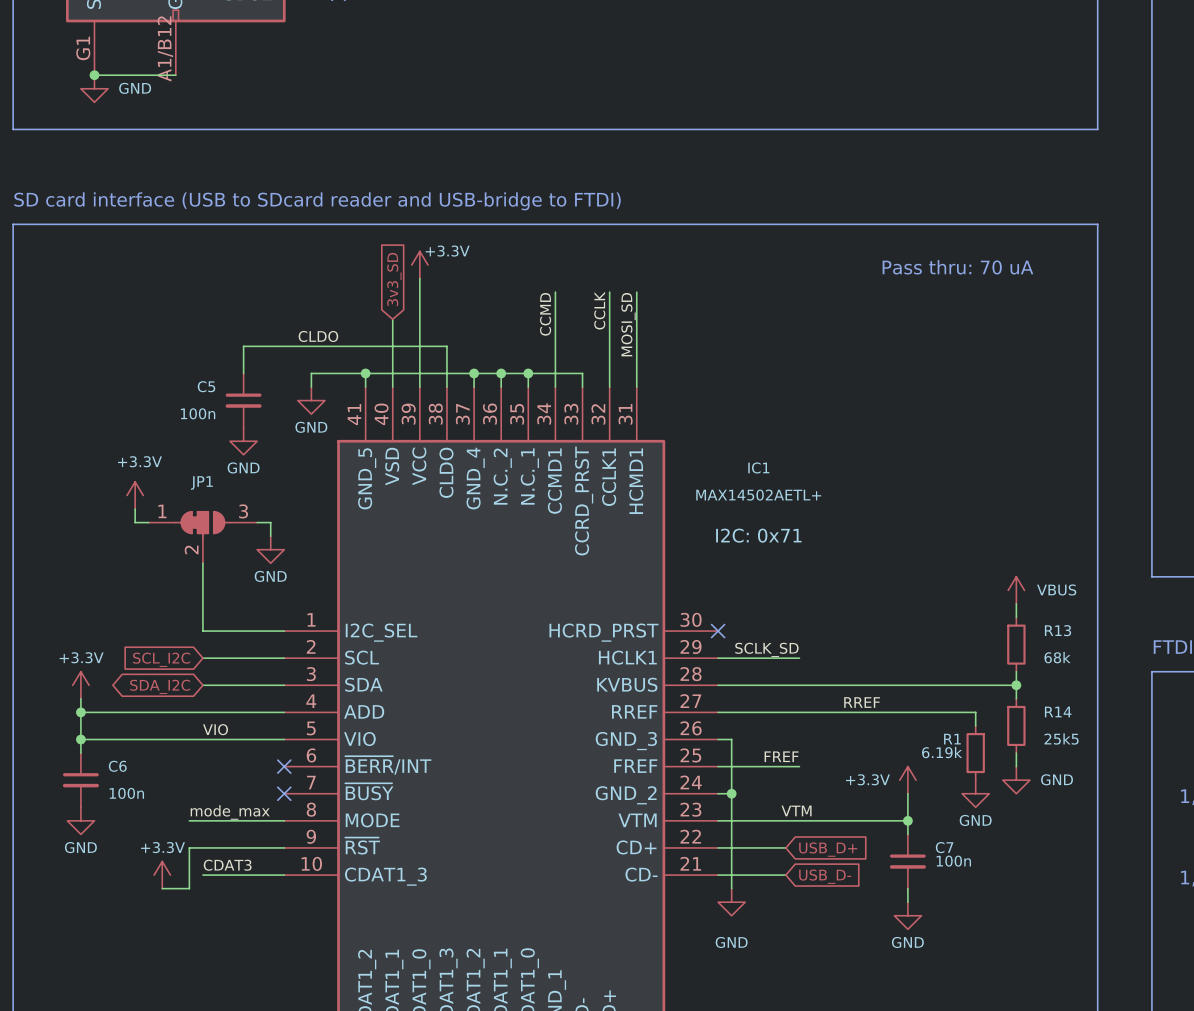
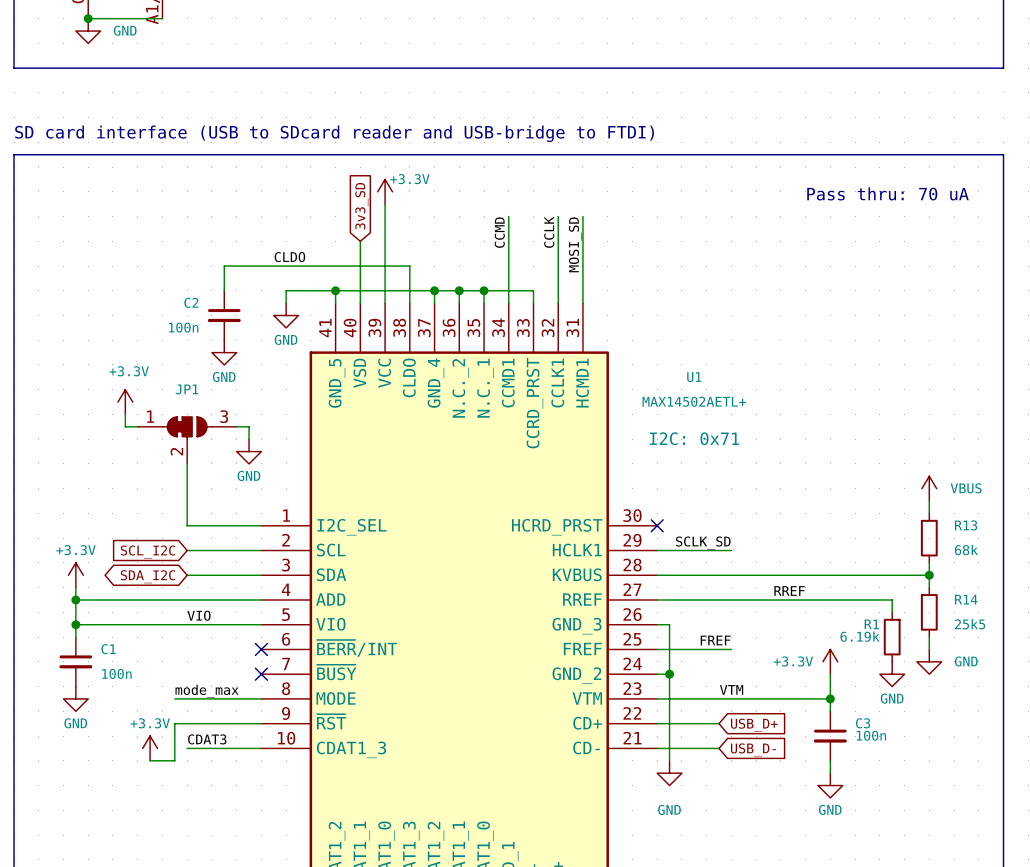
C5 name: C5 (206, 386) -> C2 (191, 302)
IC1 name: IC1 (758, 467) -> U1 (694, 377)
C6 name: C6 (117, 766) -> C1 (108, 649)
C7 name: C7 (944, 847) -> C3 (863, 723)

